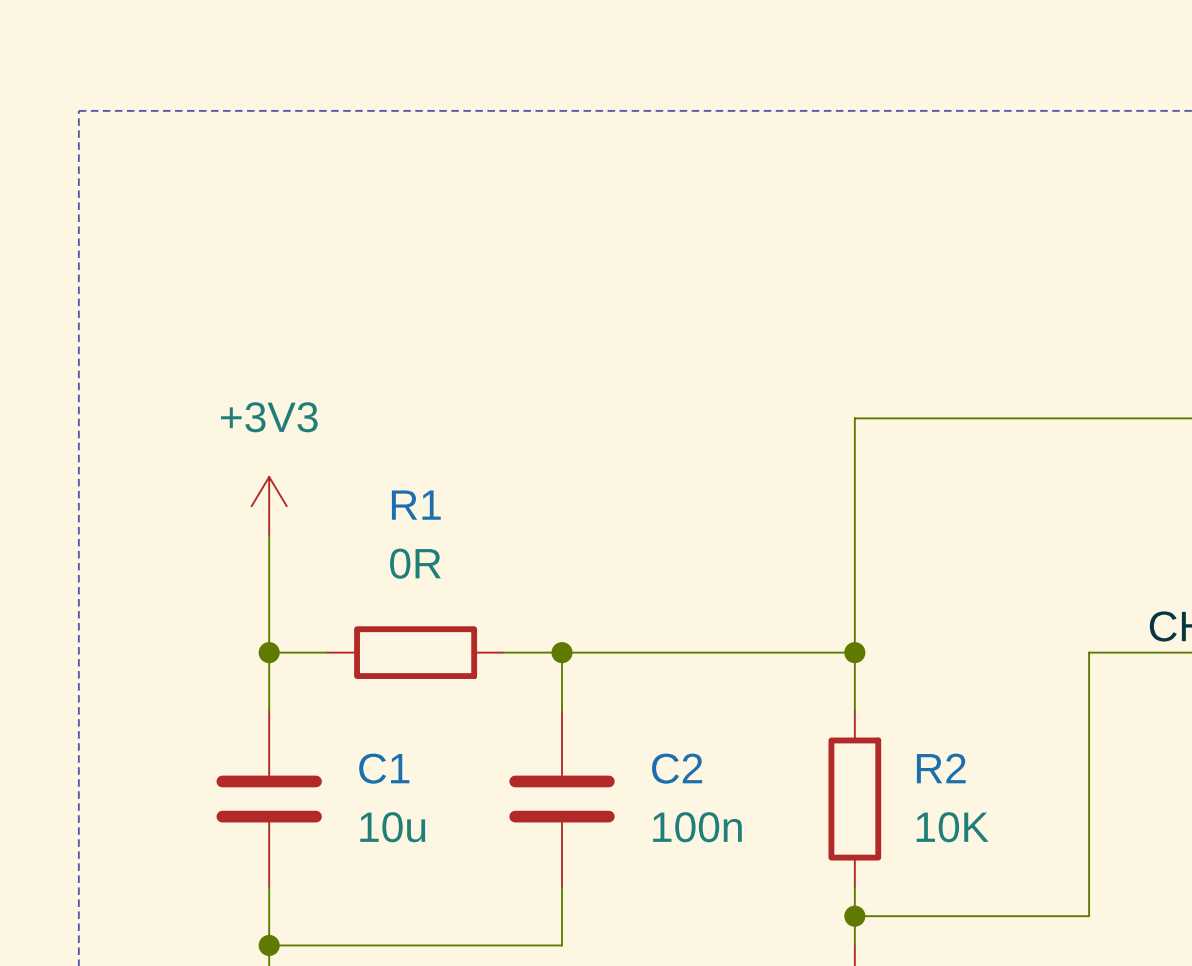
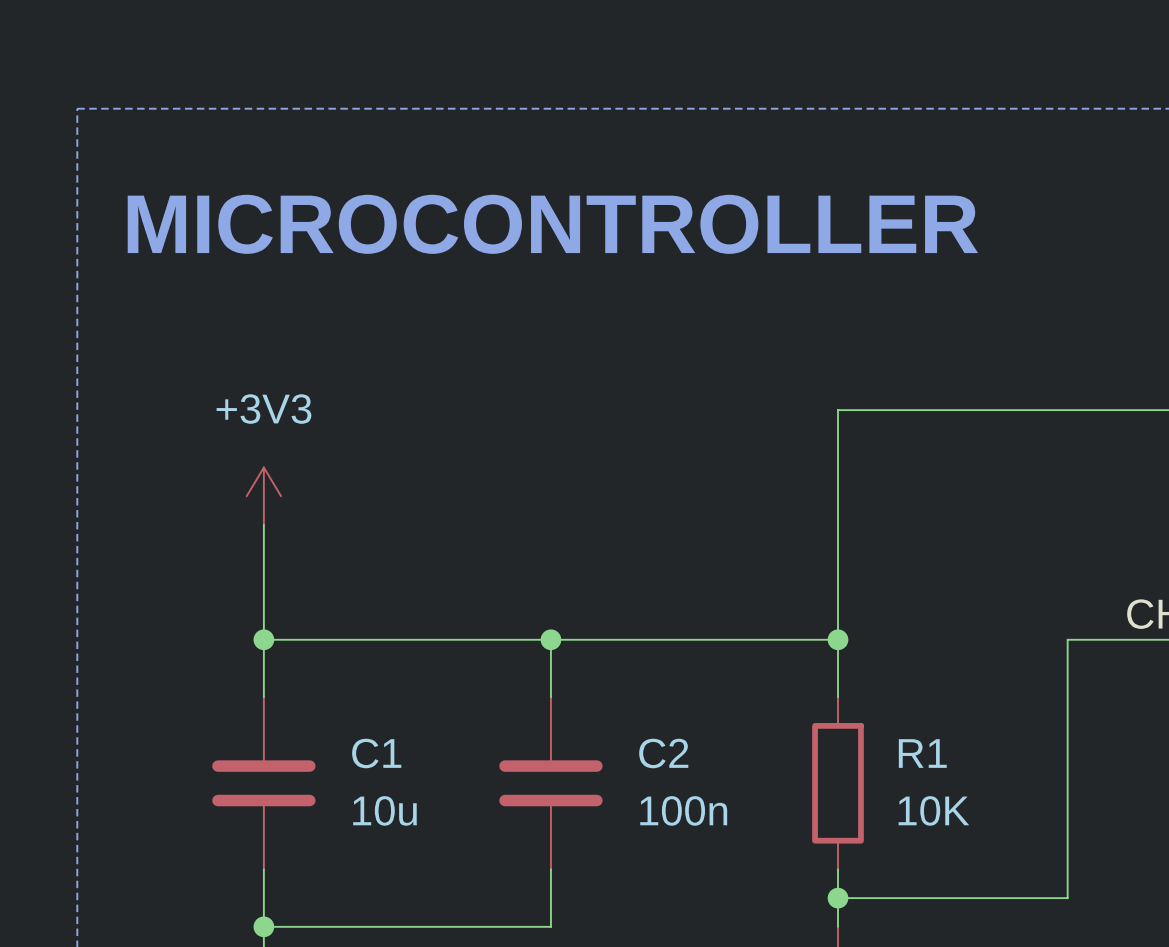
text: none -> MICROCONTROLLER (552, 224)
wire: none -> (321, 639) (493, 639)
R1: 0R (415, 652) -> none
R2 name: R2 (941, 768) -> R1 (922, 753)

